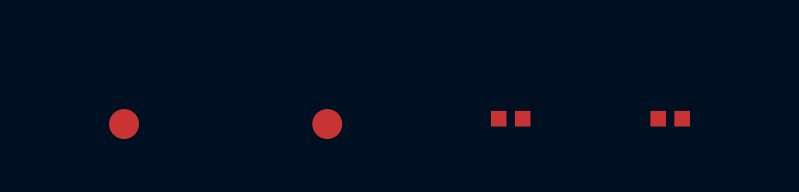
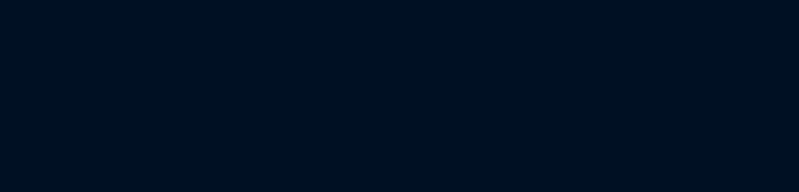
part: (510, 118) -> none
part: (670, 118) -> none
part: (124, 124) -> none
part: (327, 124) -> none

